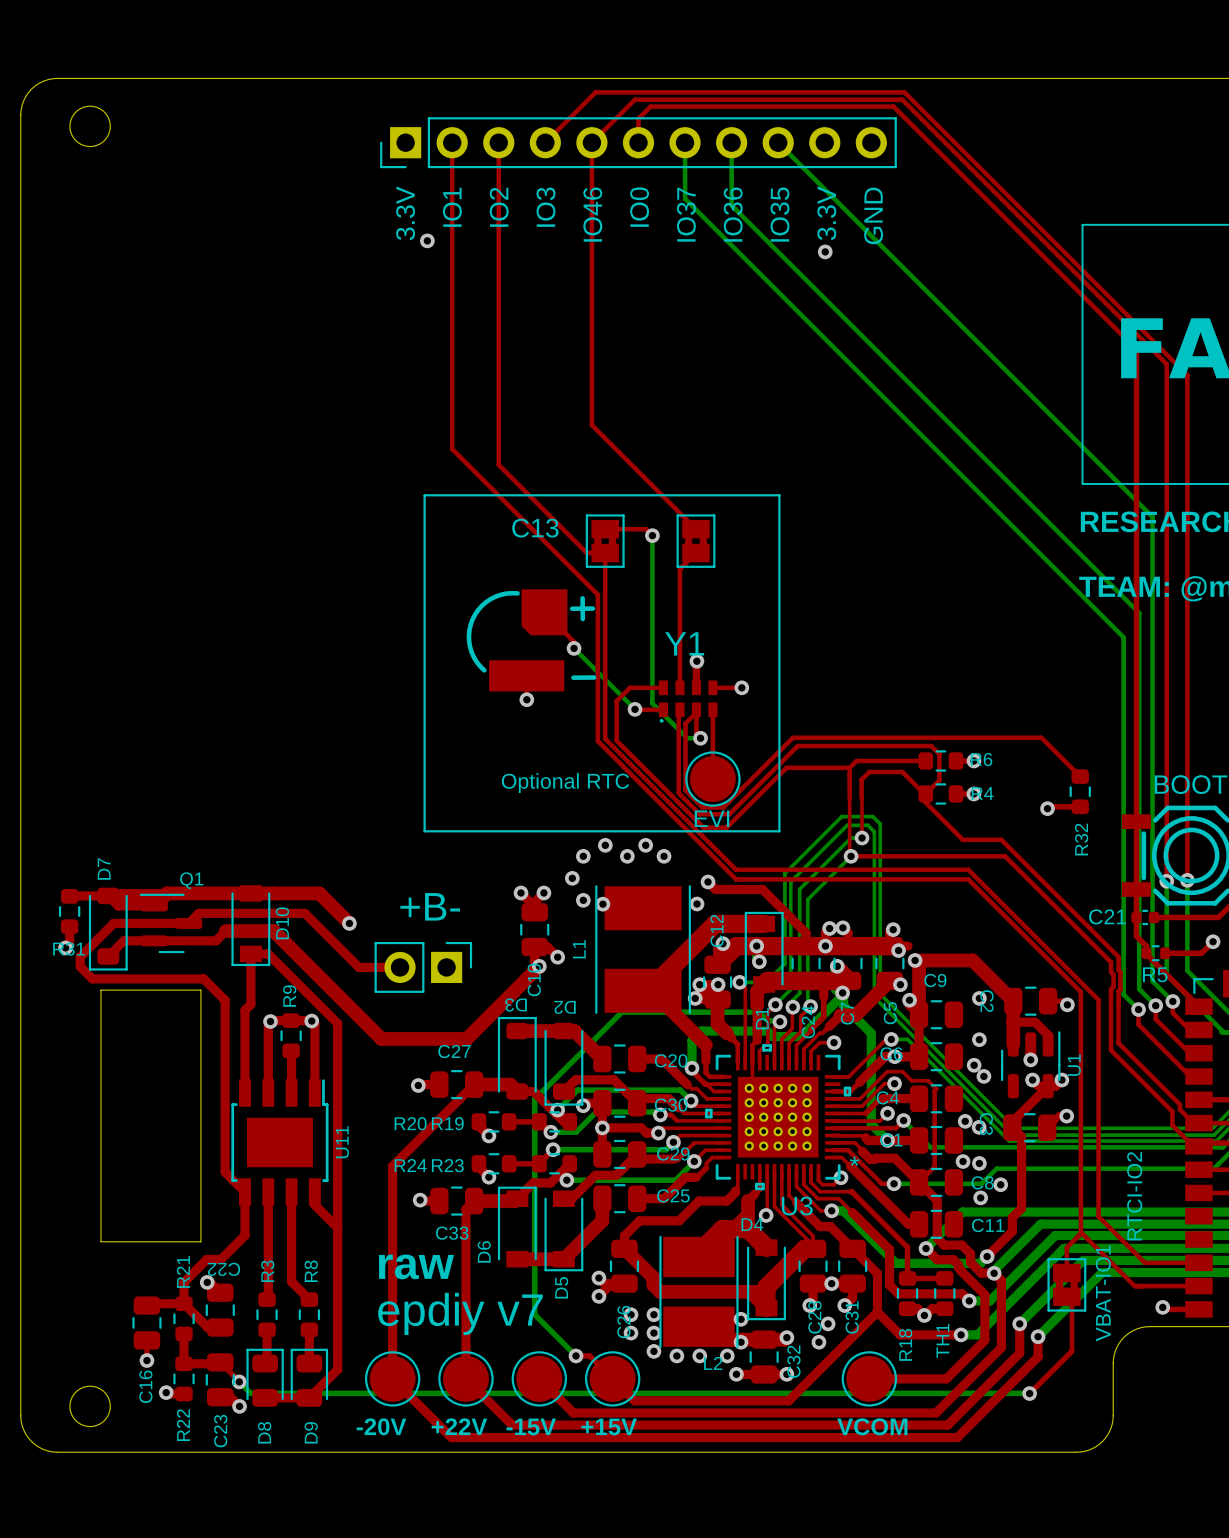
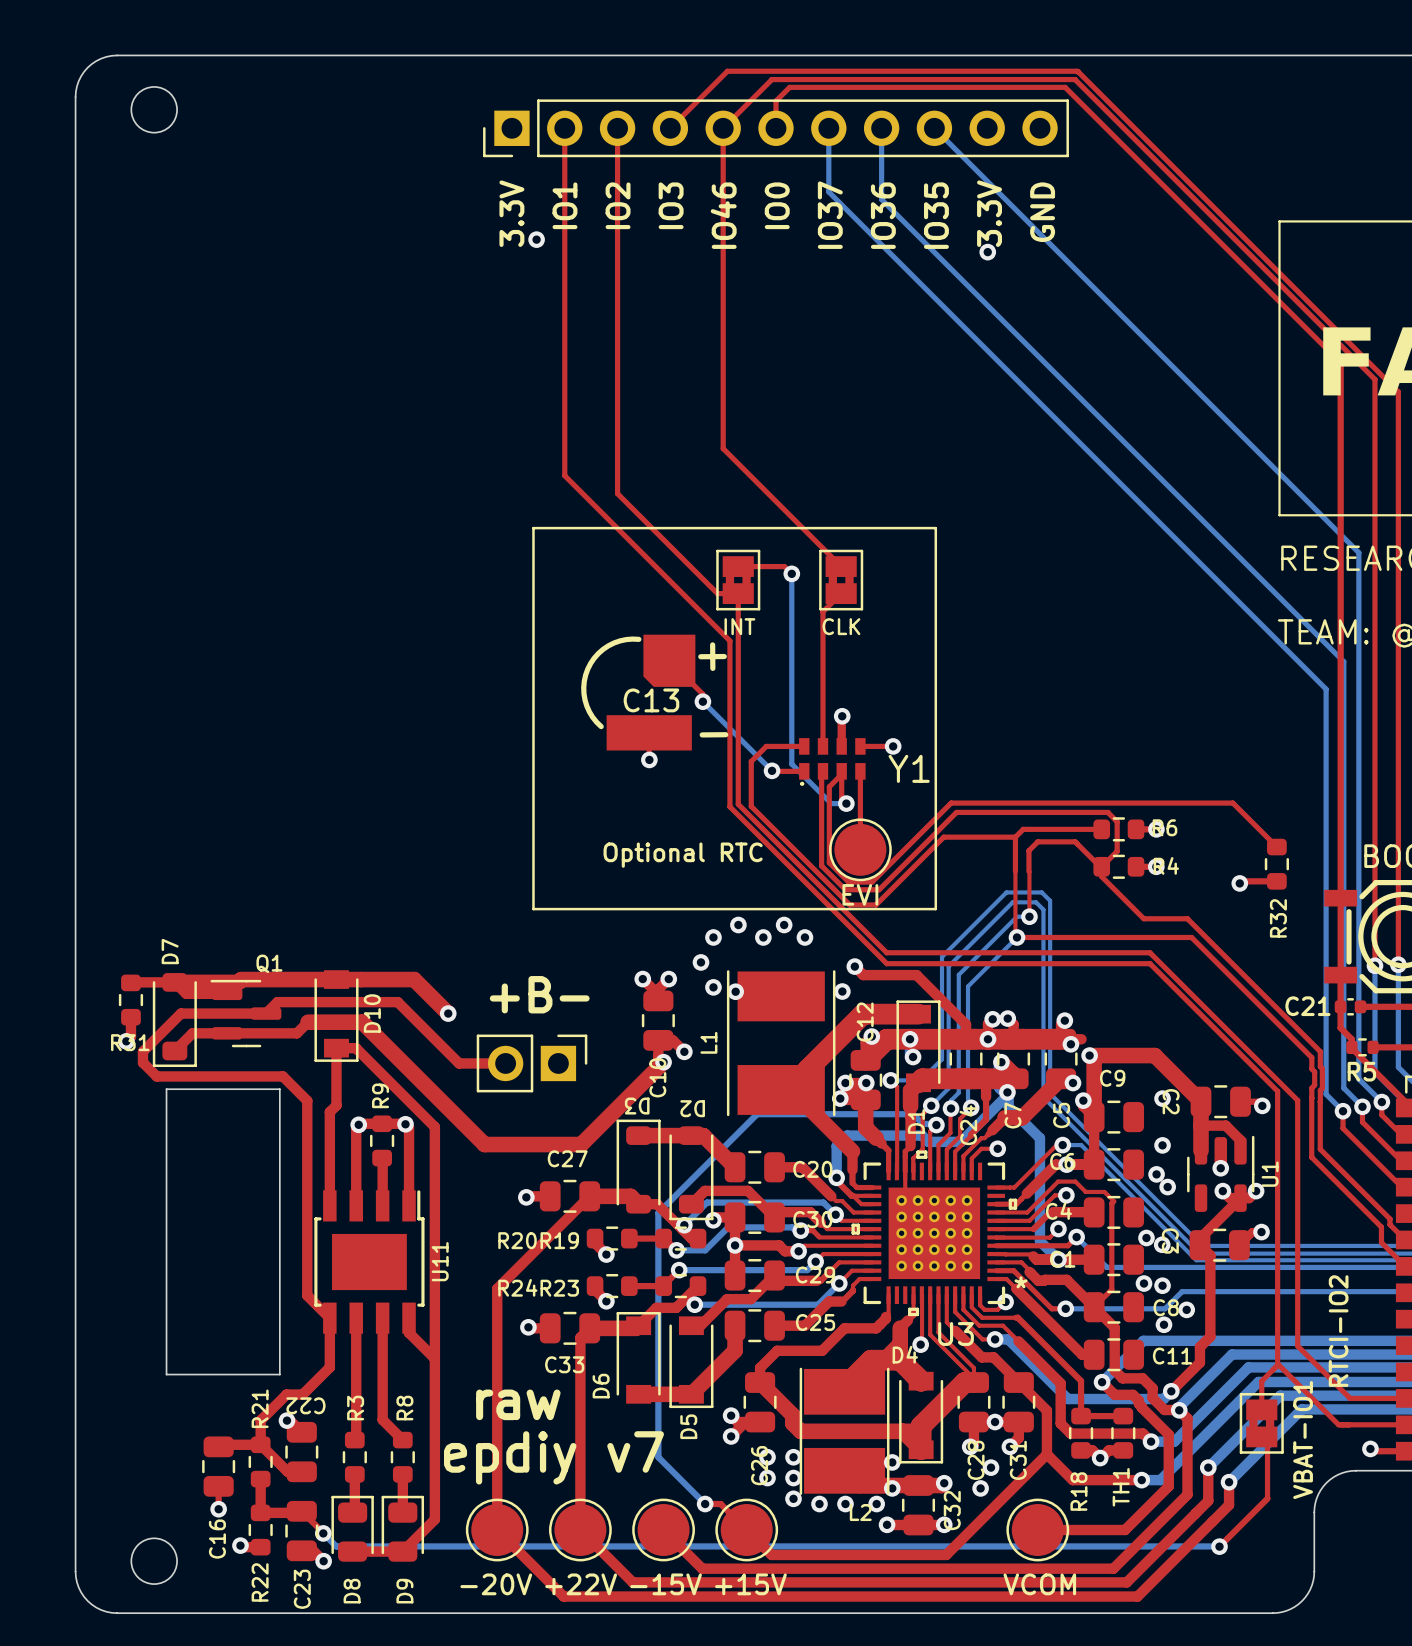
C13 name position: C13 (535, 528) -> C13 (651, 700)
text: none -> INT (739, 626)
text: none -> CLK (841, 626)
Y1 name position: Y1 (684, 643) -> Y1 (909, 768)

